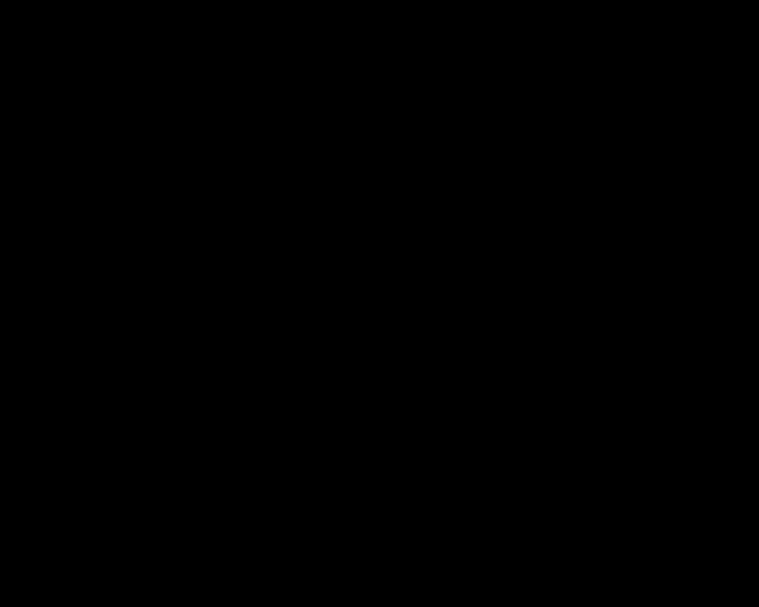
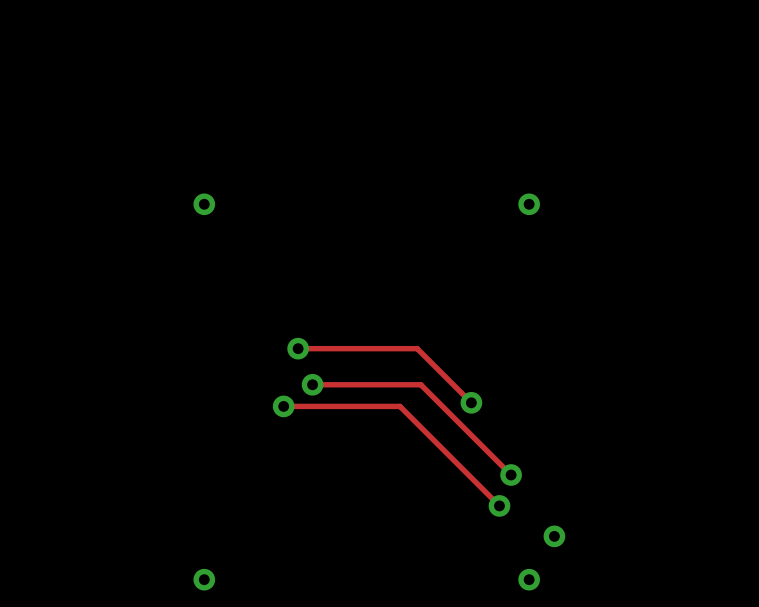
via: none -> (204, 204)
via: none -> (529, 204)
track: none -> (298, 348) (417, 348) (471, 402)
via: none -> (298, 348)
track: none -> (312, 384) (420, 384) (511, 475)
via: none -> (312, 384)
via: none -> (471, 402)
track: none -> (283, 406) (399, 406) (499, 505)
via: none -> (283, 406)
via: none -> (511, 475)
via: none -> (499, 505)
via: none -> (554, 536)
via: none -> (204, 579)
via: none -> (529, 579)

